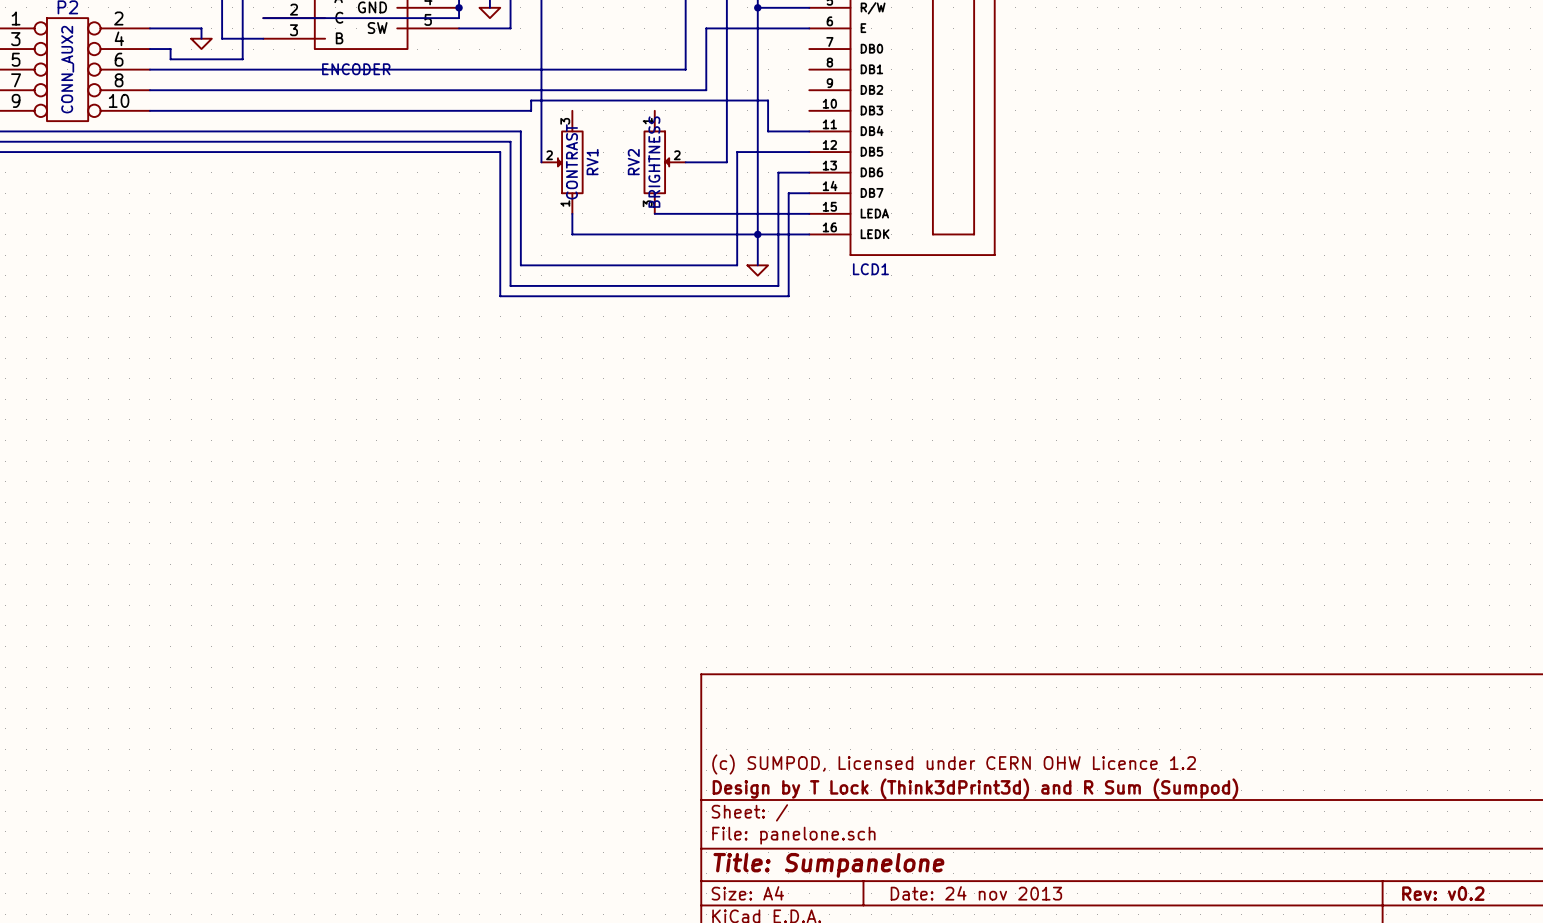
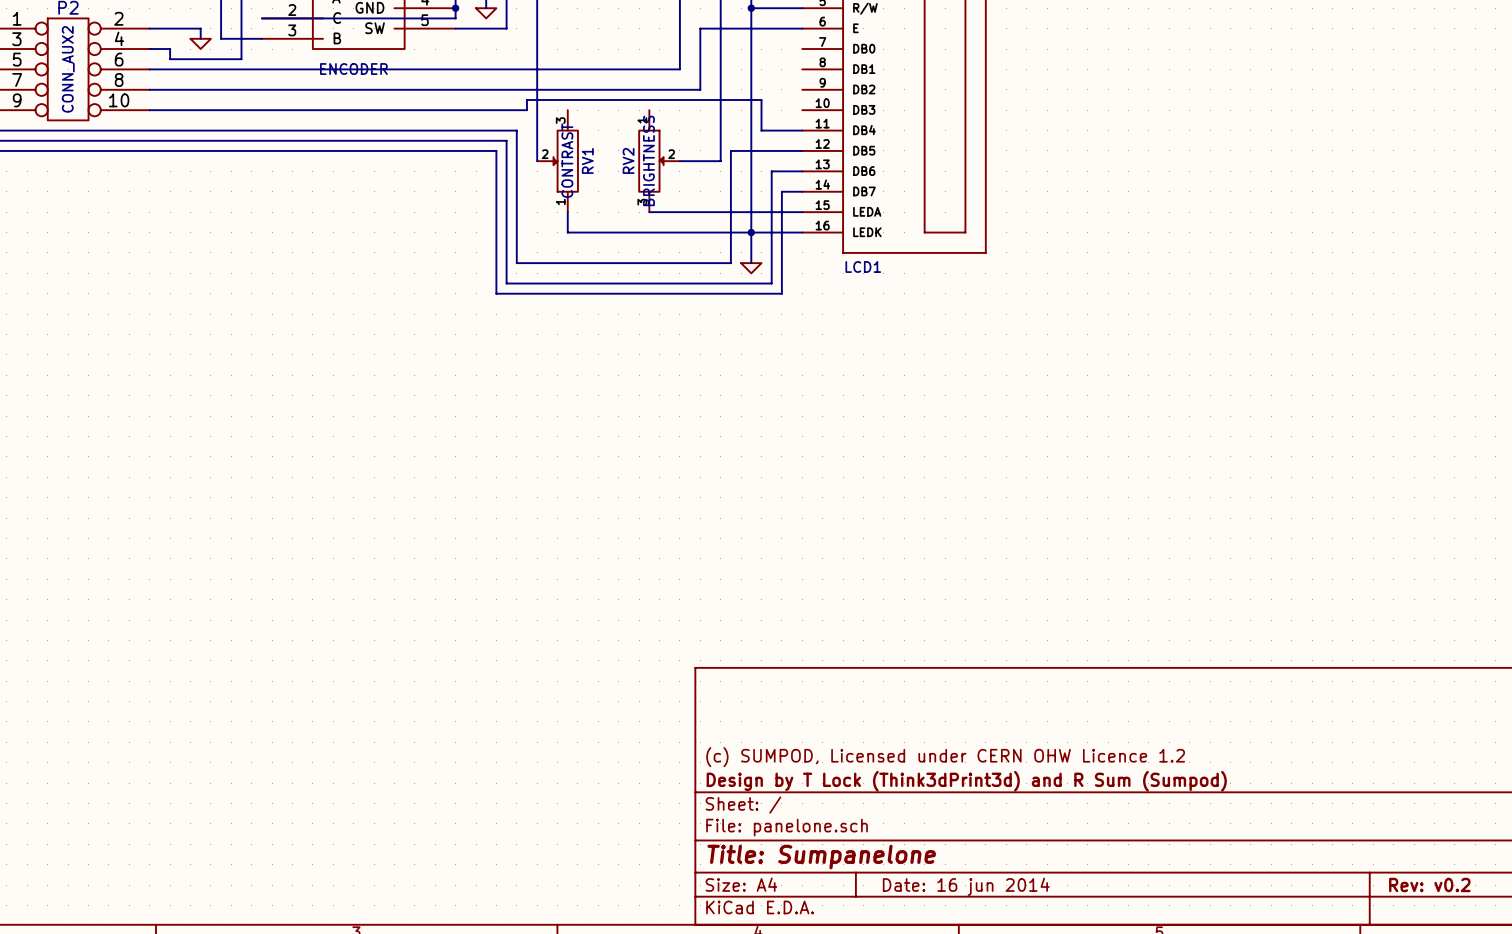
title block: Date: 24 nov 2013 (976, 893) -> Date: 16 jun 2014 (966, 886)

